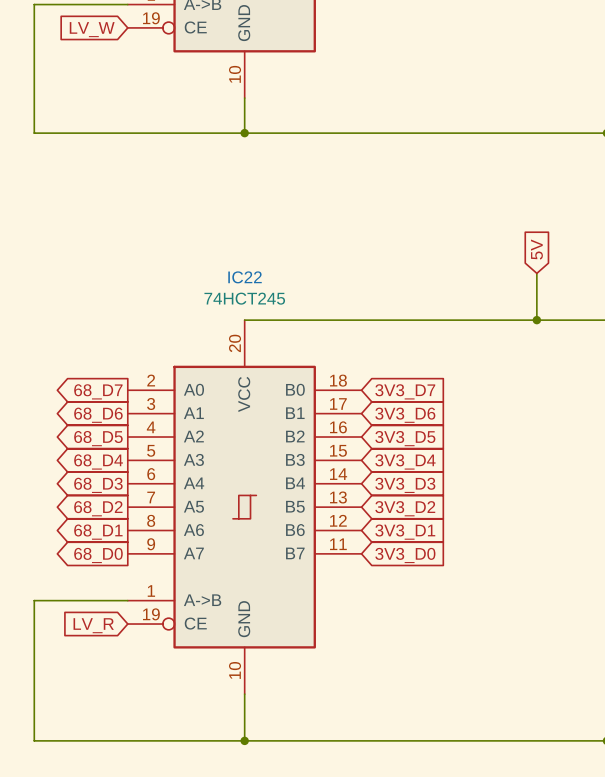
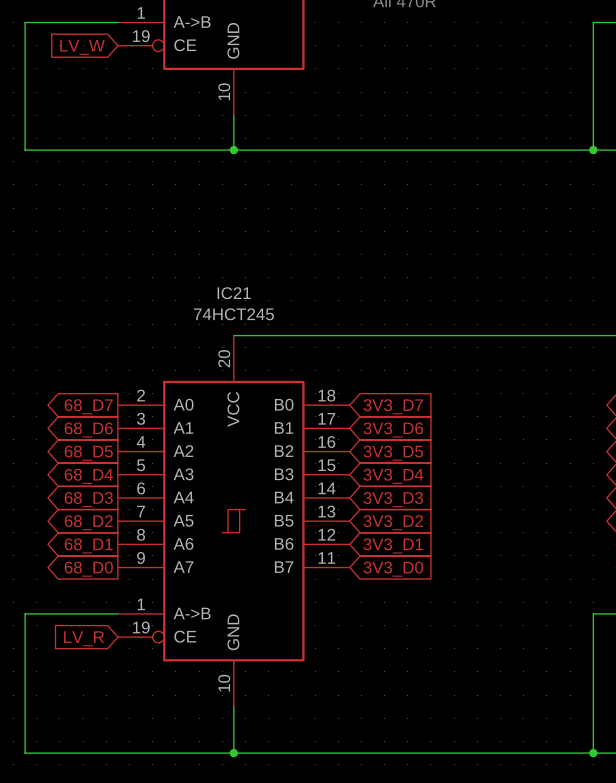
global label: 5V (536, 249) -> none
wire: (536, 273) (536, 320) -> none
IC22 name: IC22 (245, 277) -> IC21 (234, 293)
junction: (536, 320) -> none

